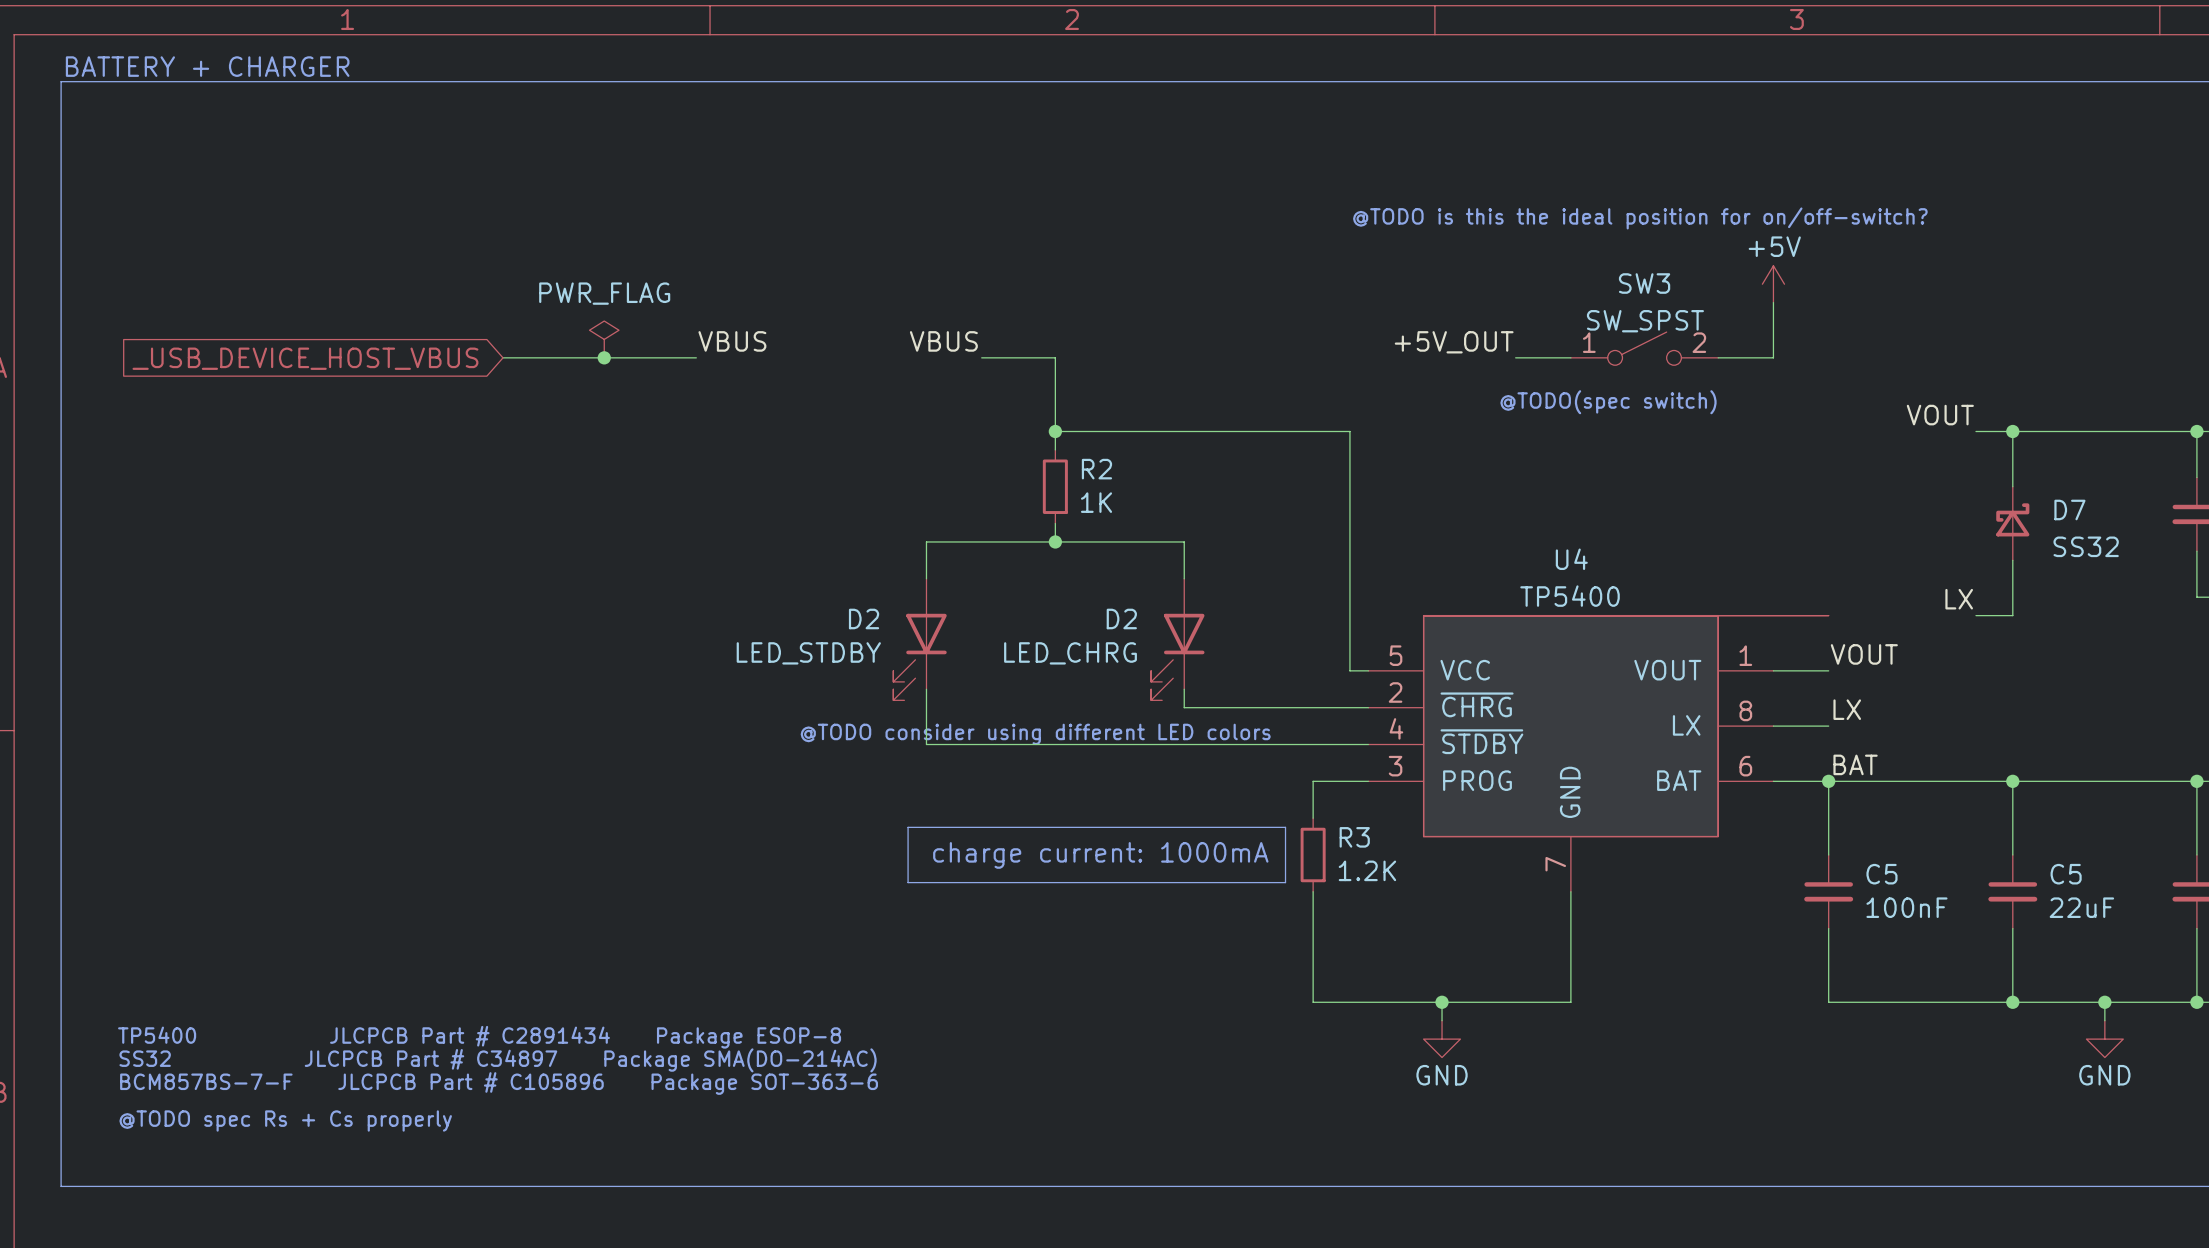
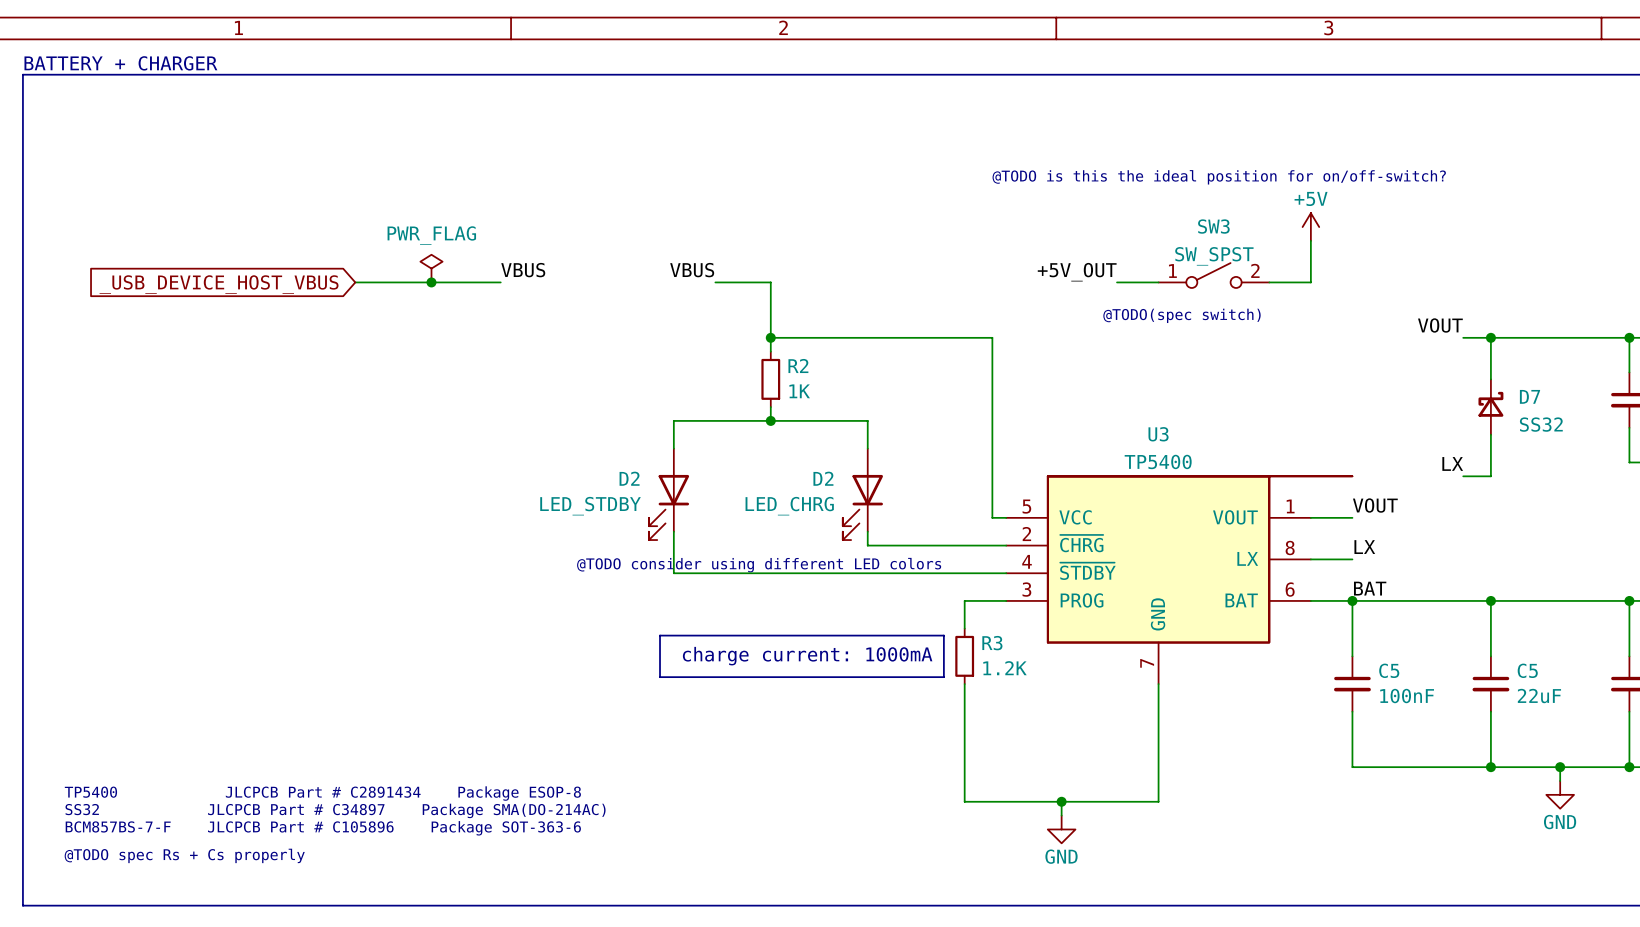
U4 name: U4 (1571, 559) -> U3 (1158, 434)
wire: (1313, 1002) (1570, 1002) -> (964, 767) (964, 801) (1158, 801) (1158, 767)
wire: (1442, 1002) (1442, 1020) -> (1061, 801) (1061, 815)
junction position: (1442, 1002) -> (1061, 801)
power symbol position: GND (1442, 1039) -> GND (1061, 829)

